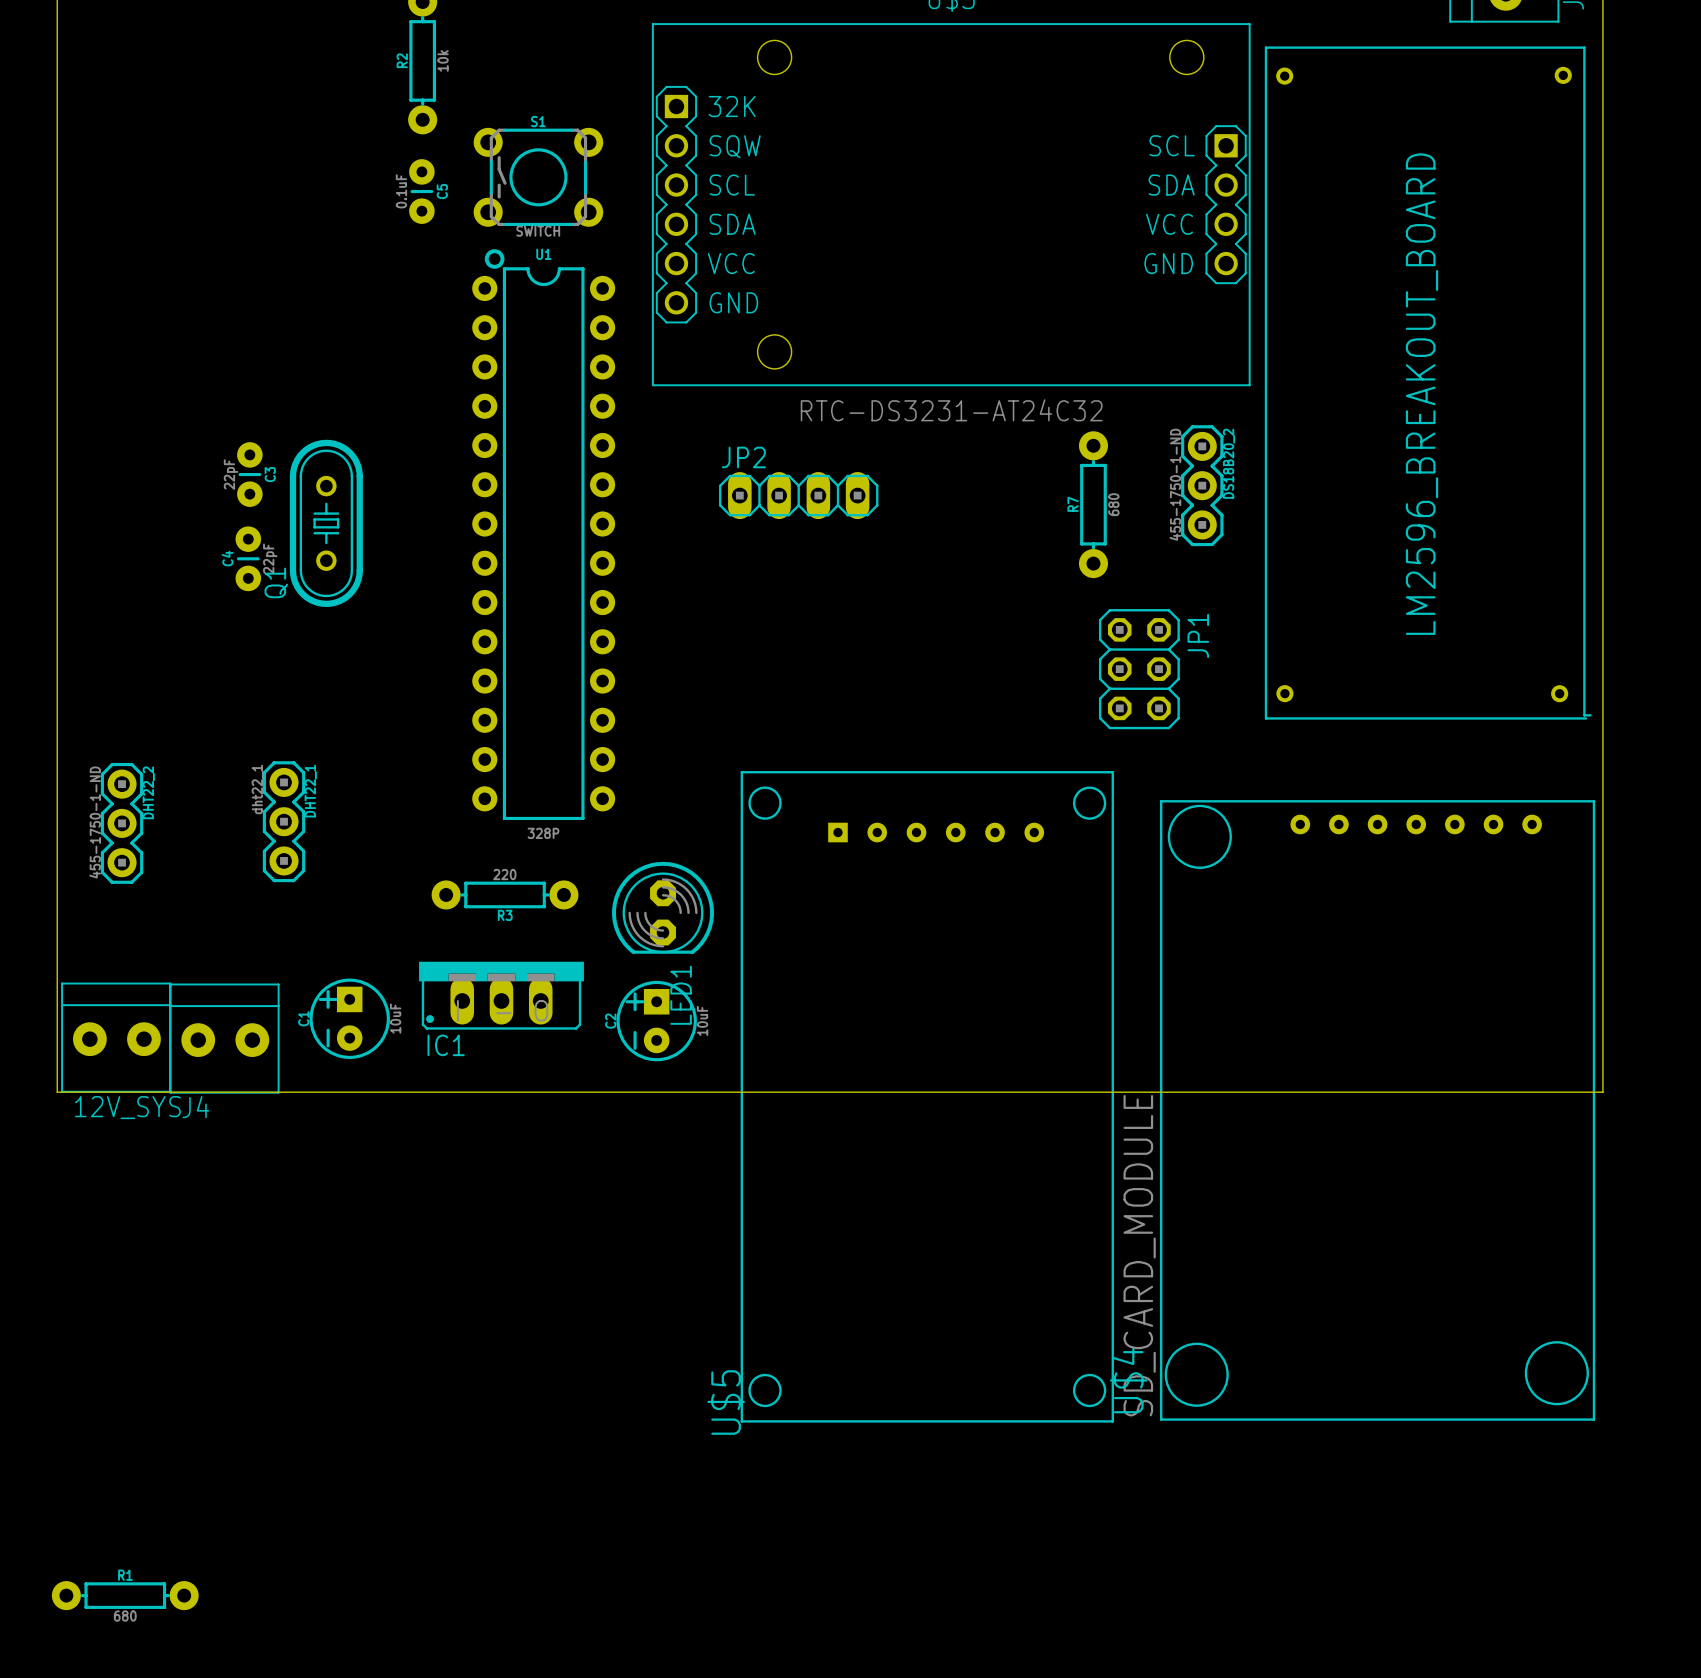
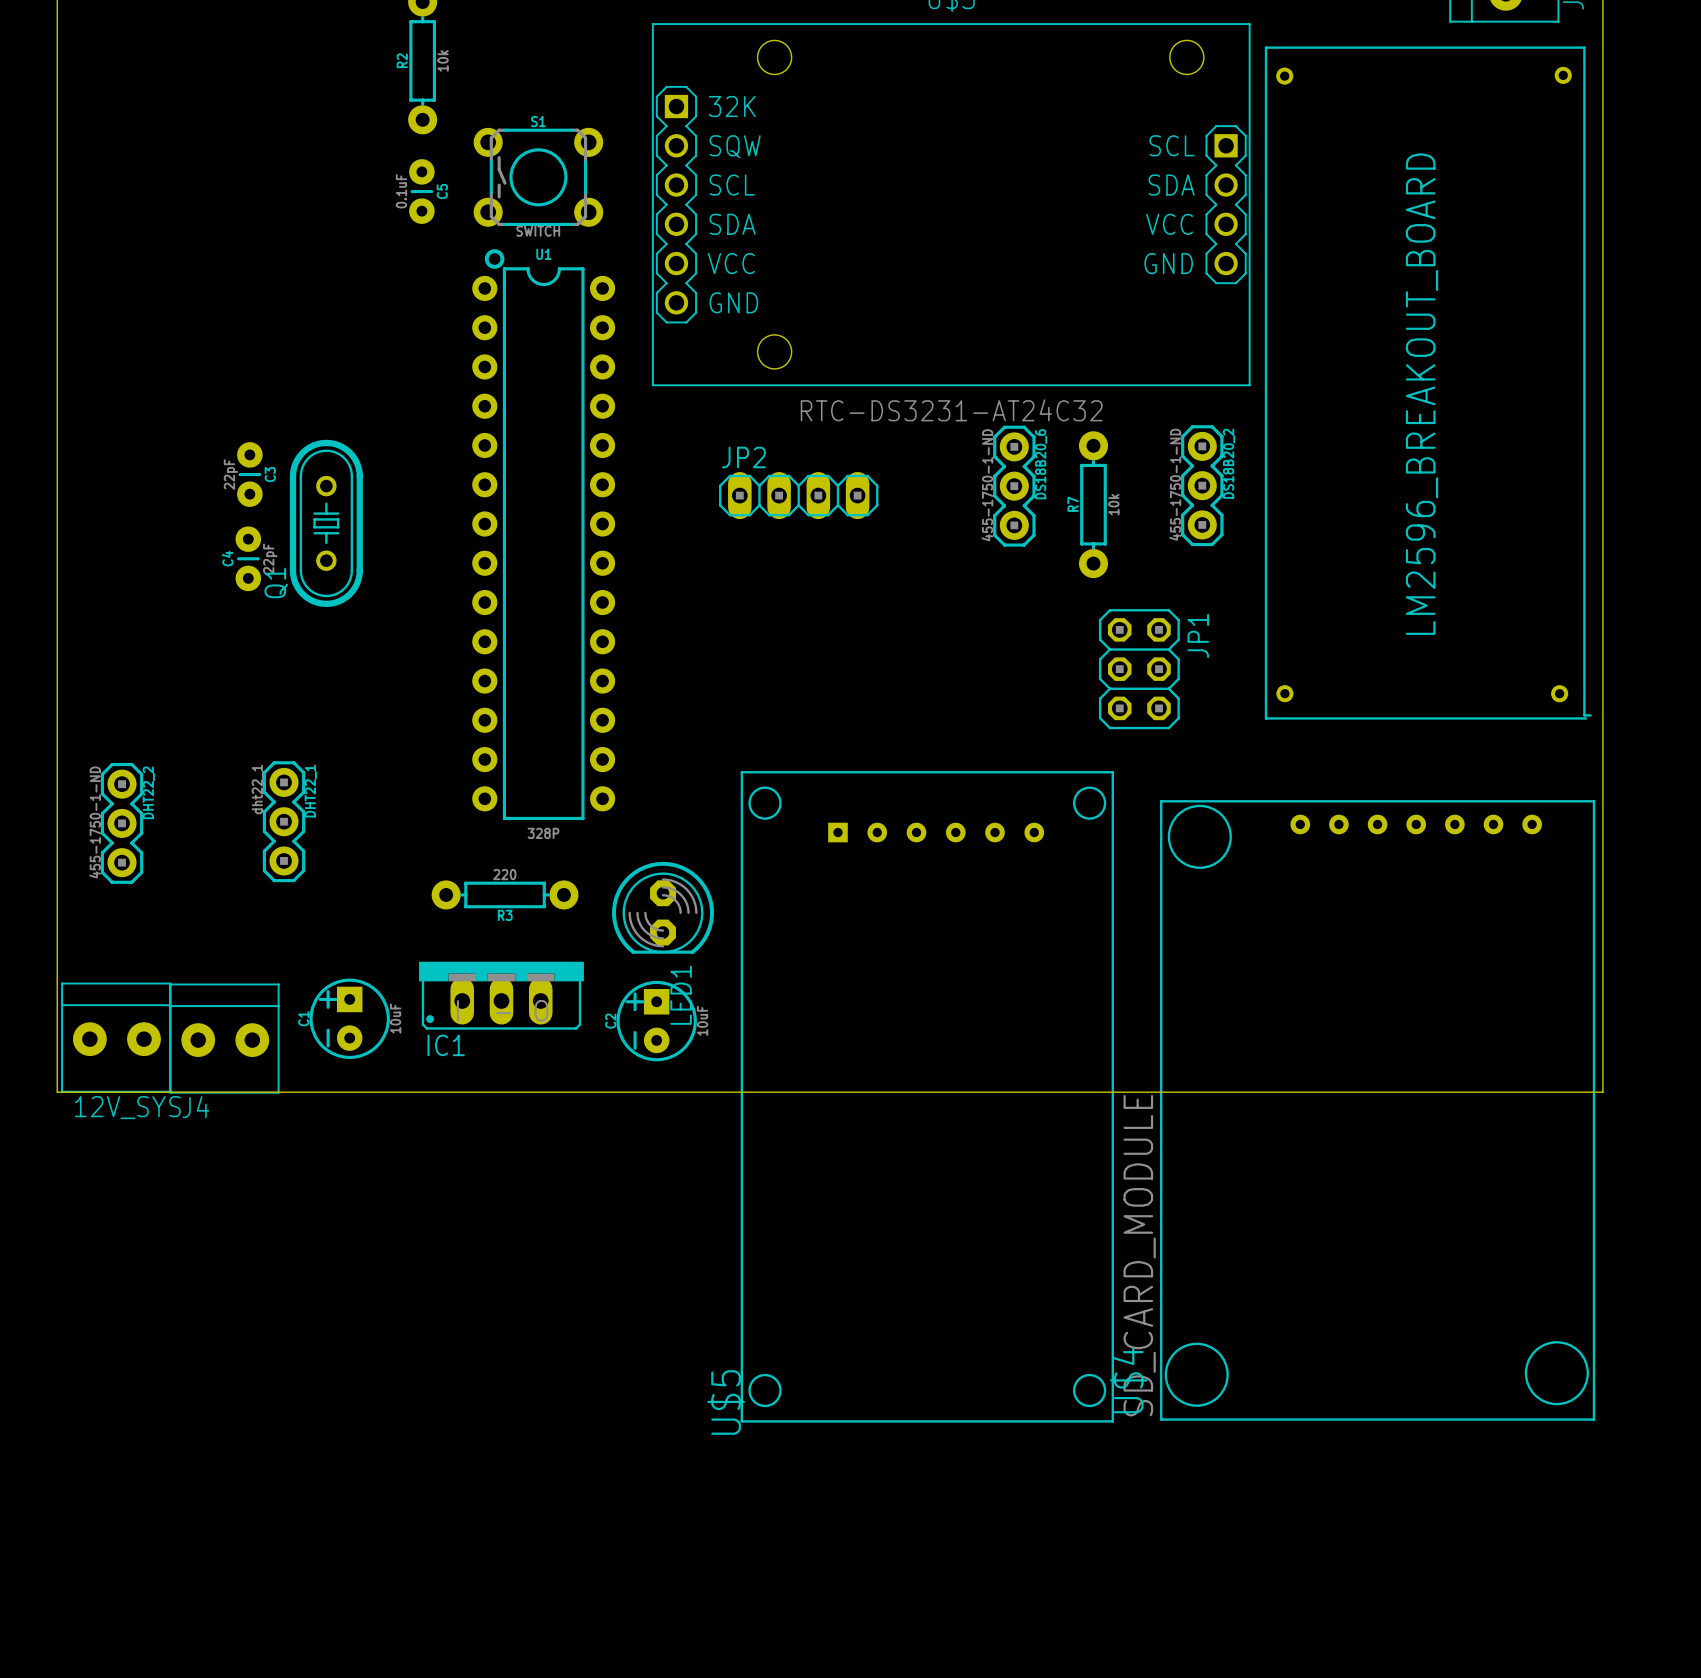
DS18B20_6: none -> 455-1750-1-ND (1014, 486)
R7 value: 680 (1113, 504) -> 10k (1113, 504)
R1: 680 (125, 1595) -> none

